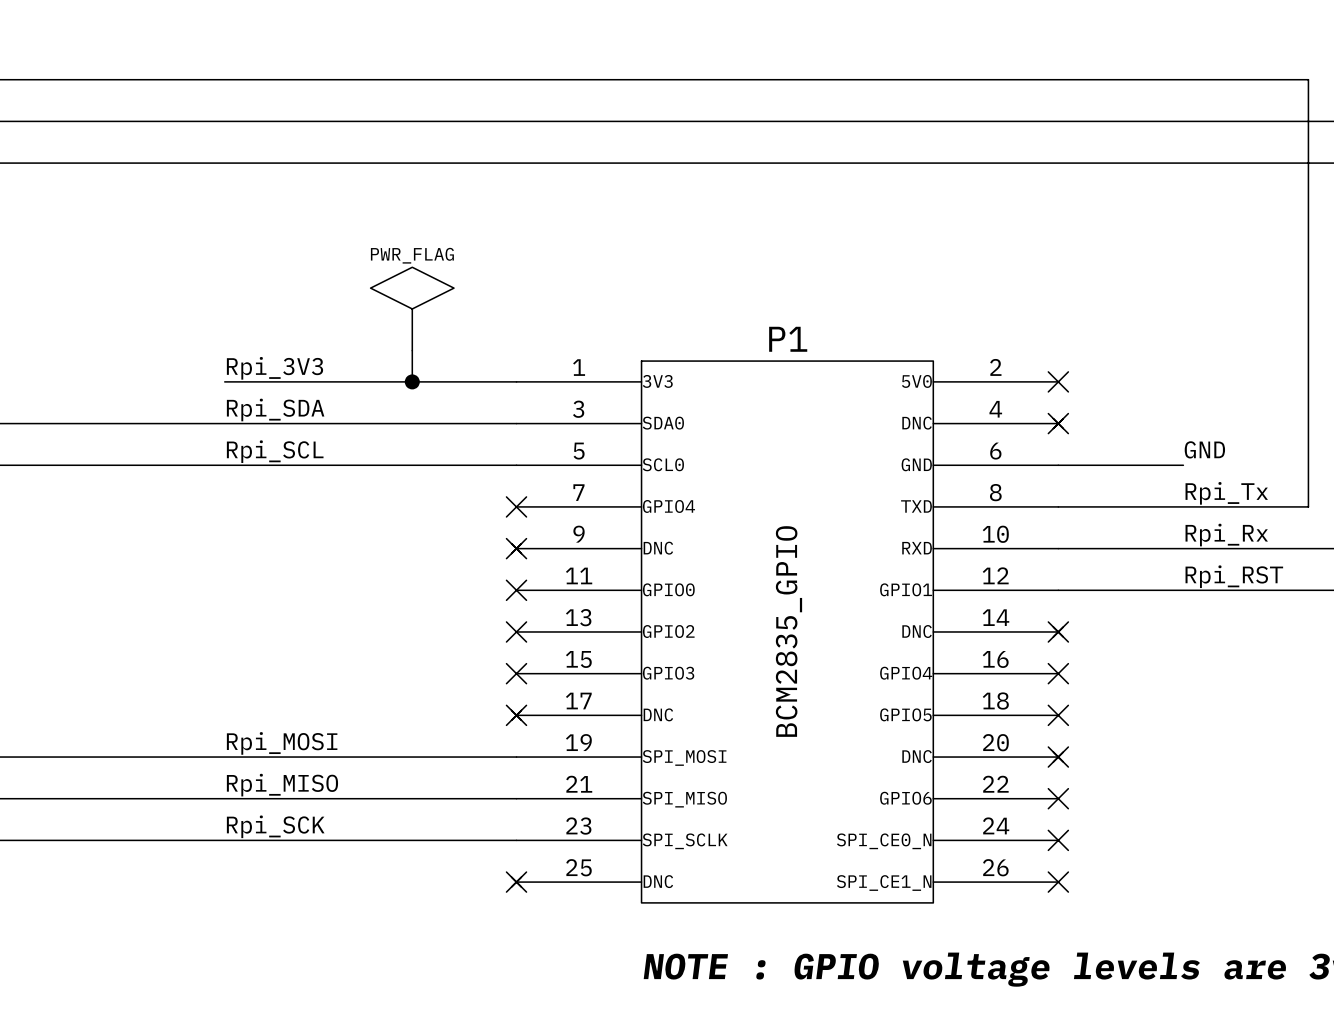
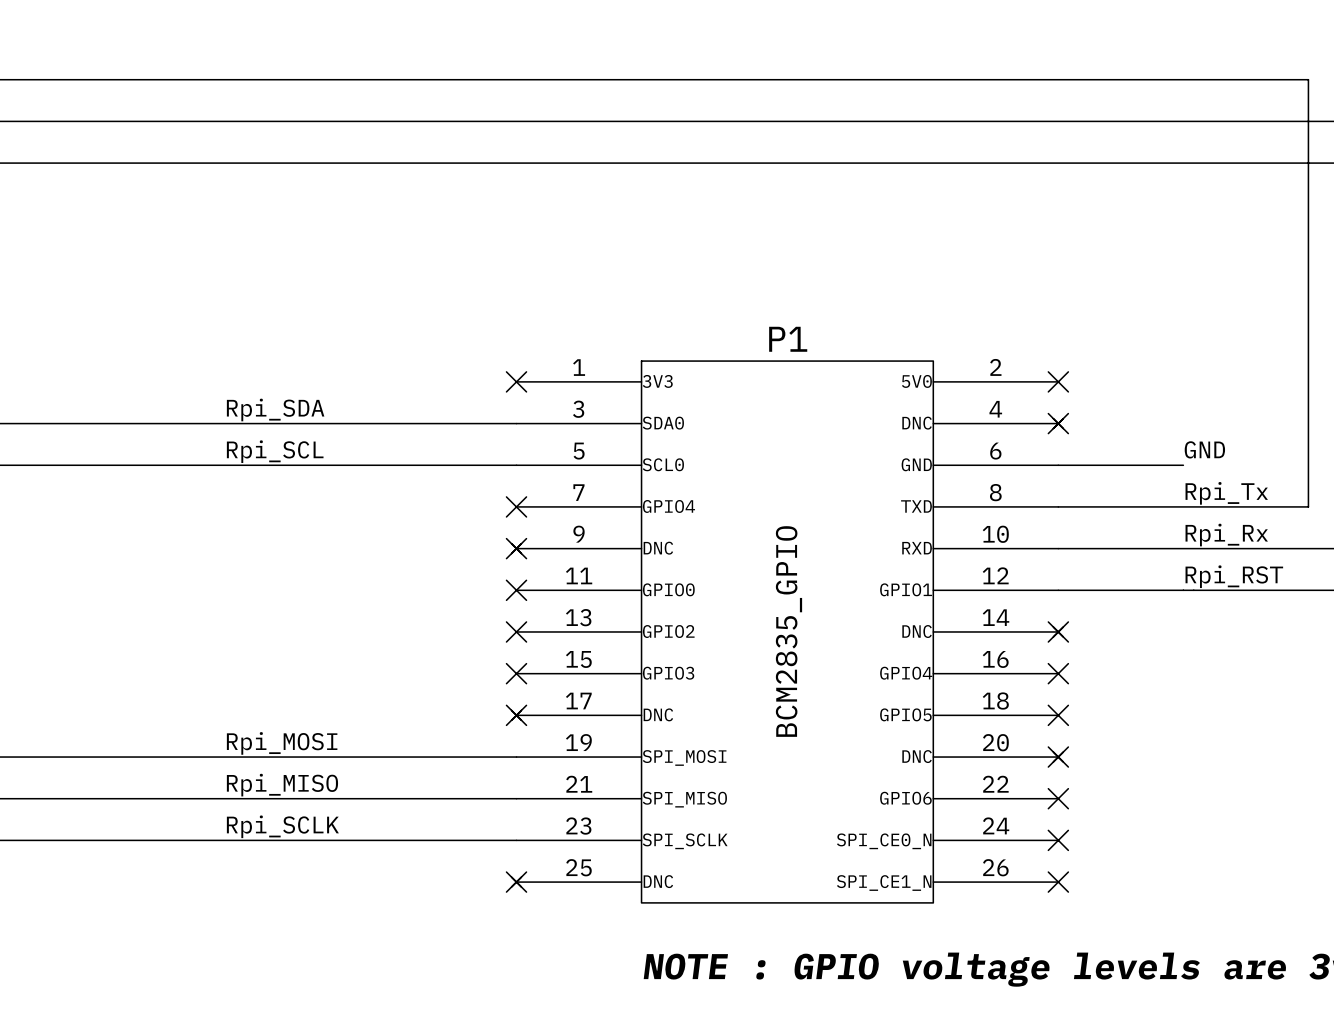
power symbol: PWR_FLAG (412, 308) -> none
wire: (412, 350) (412, 381) -> none
label: Rpi_3V3 (274, 368) -> none
wire: (224, 381) (516, 381) -> none
junction: (412, 381) -> none
no-connect mark: none -> (516, 381)
label: Rpi_SCK (275, 826) -> Rpi_SCLK (282, 826)

